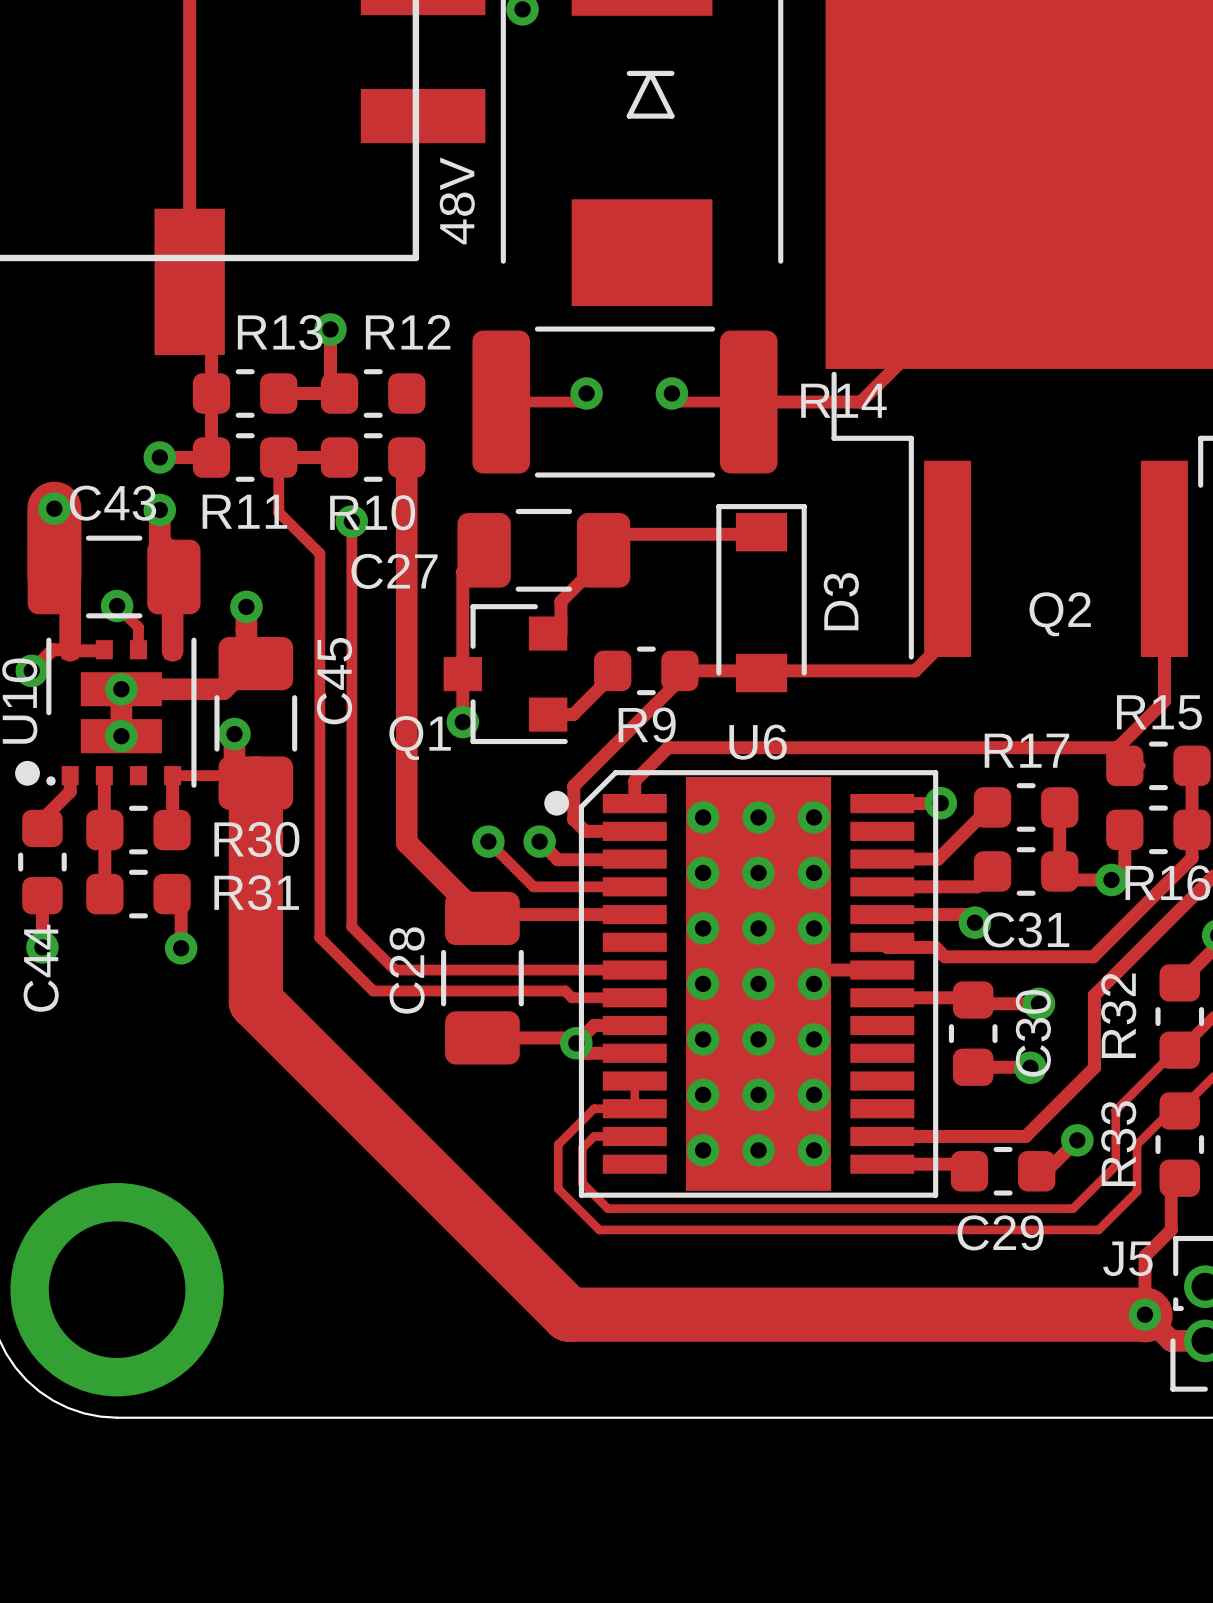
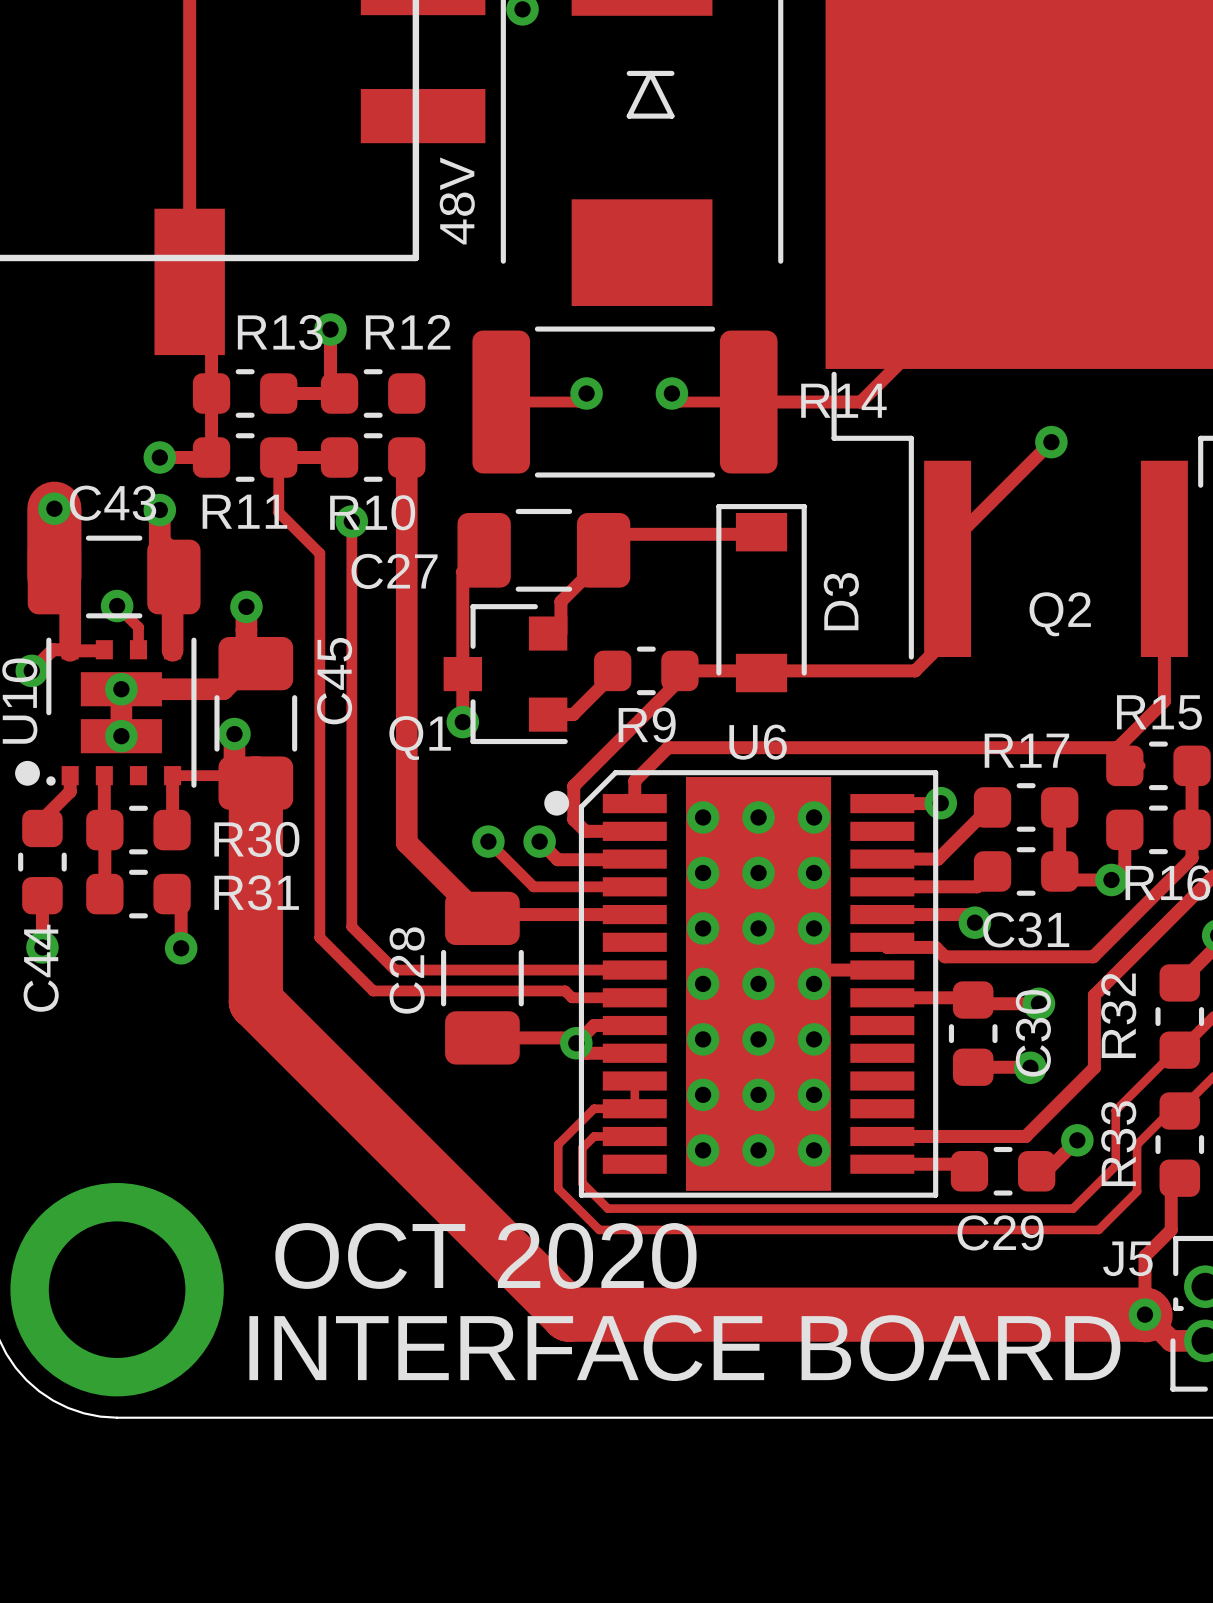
track: none -> (1051, 442) (947, 545) (947, 558)
via: none -> (1051, 442)
text: none -> OCT 2020 (485, 1255)
text: none -> INTERFACE BOARD (684, 1348)

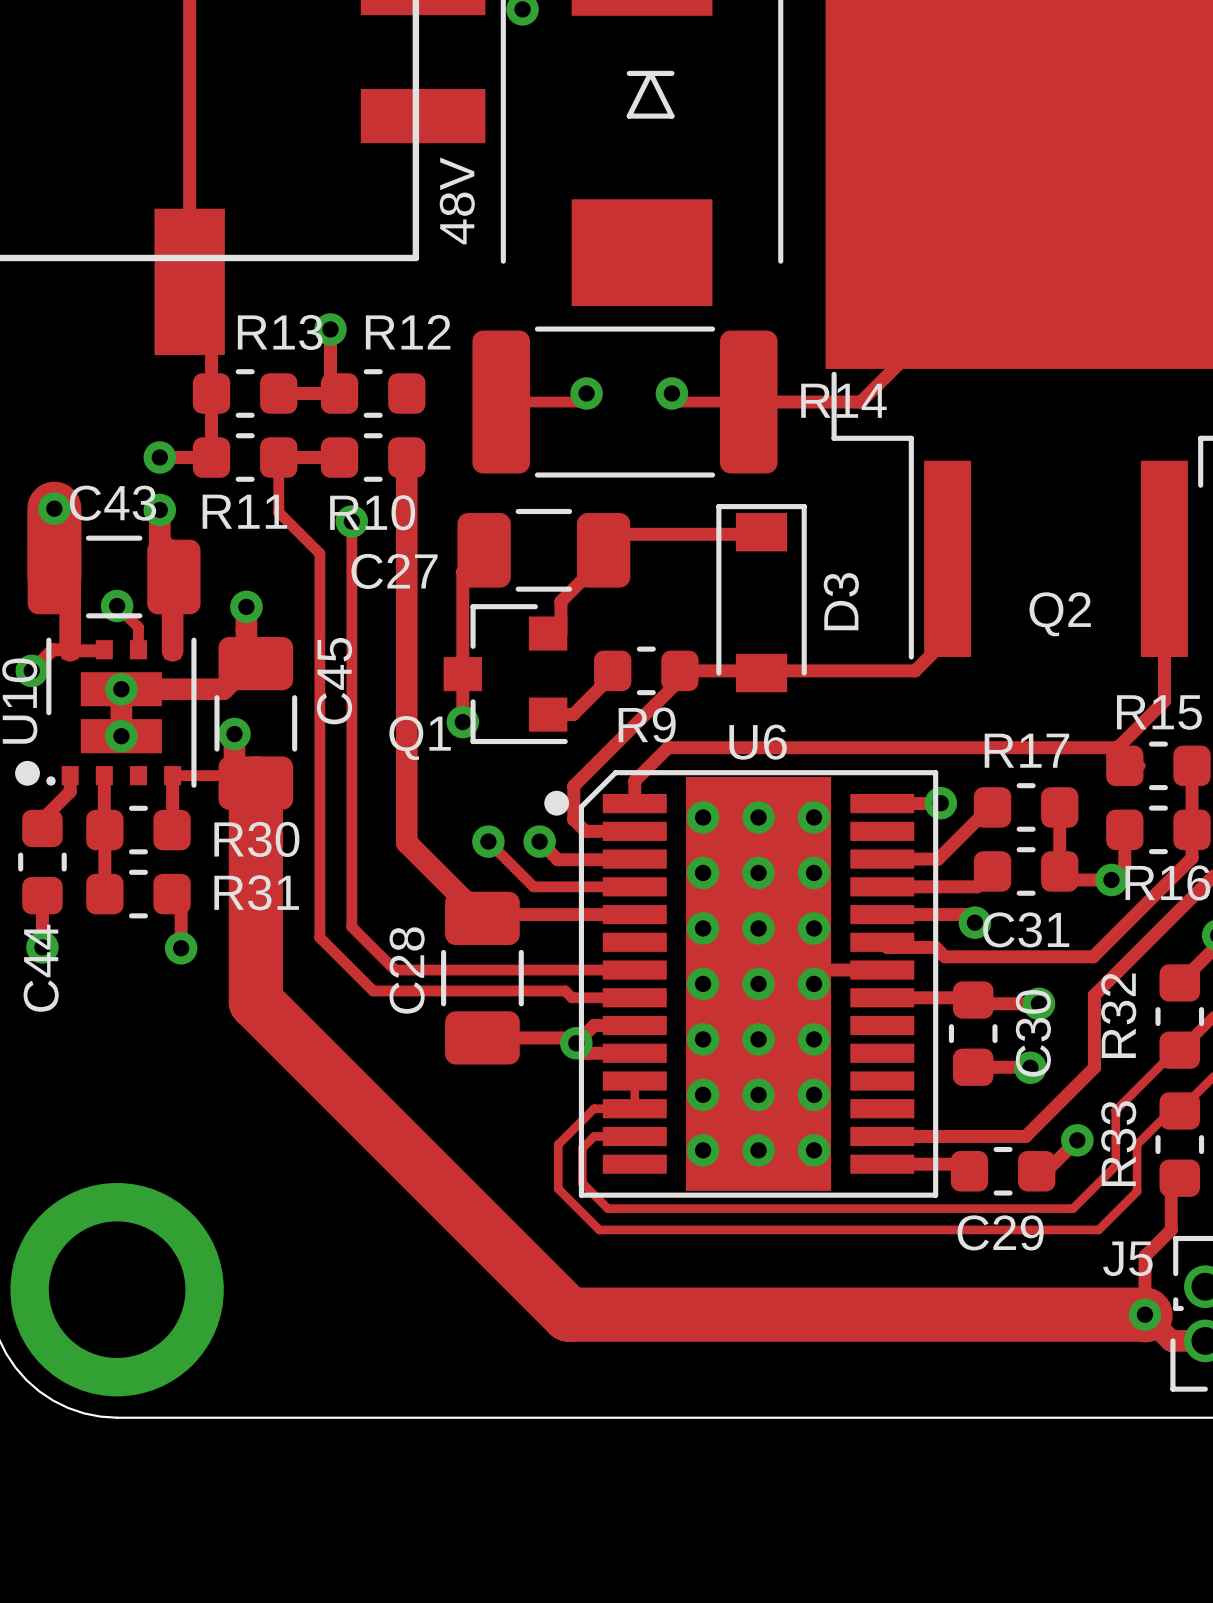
track: (1051, 442) (947, 545) (947, 558) -> none
via: (1051, 442) -> none
text: OCT 2020 (485, 1255) -> none
text: INTERFACE BOARD (684, 1348) -> none

